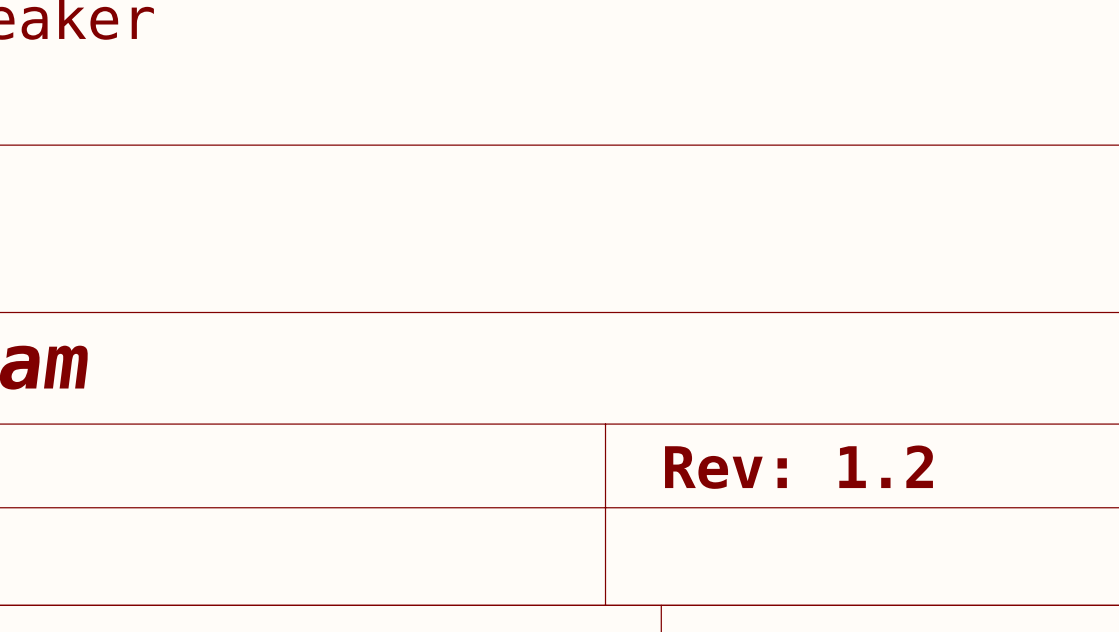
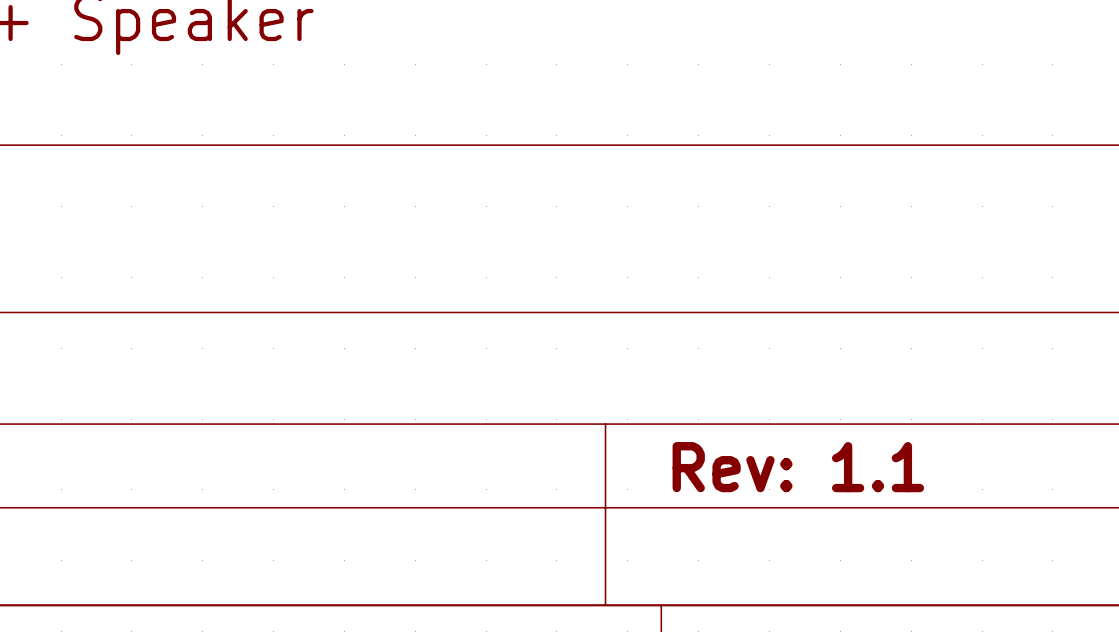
title block: Rev: 1.2 (798, 467) -> Rev: 1.1 (798, 467)

